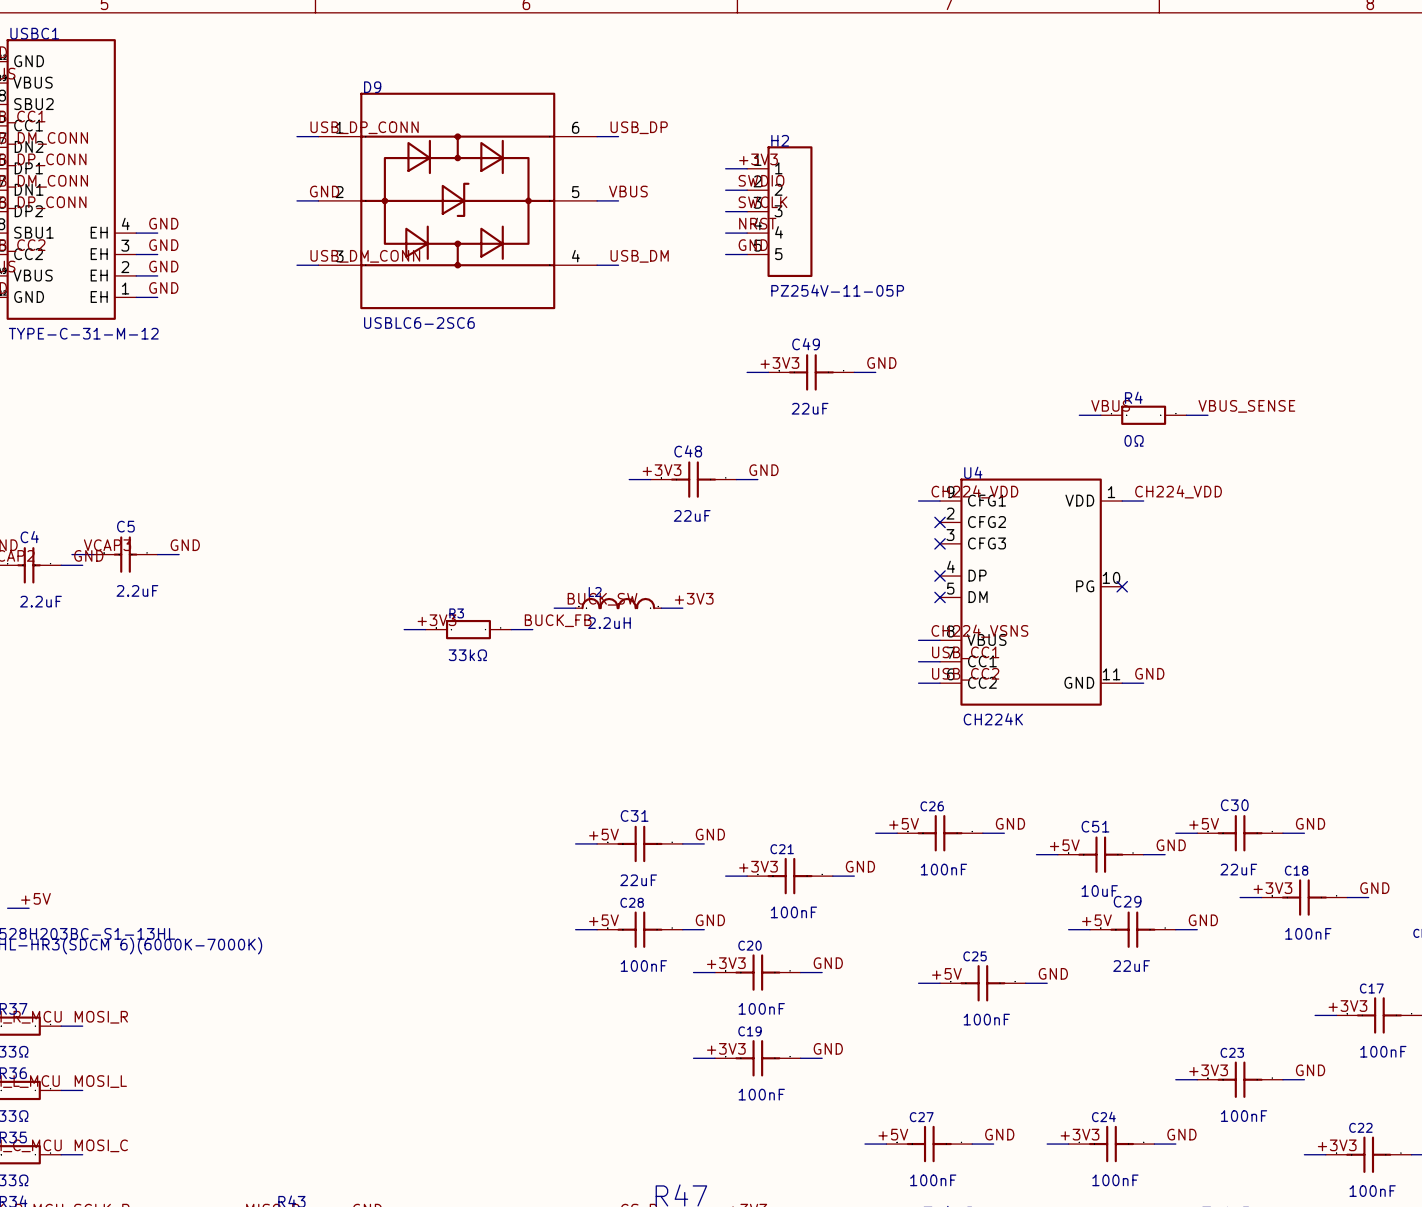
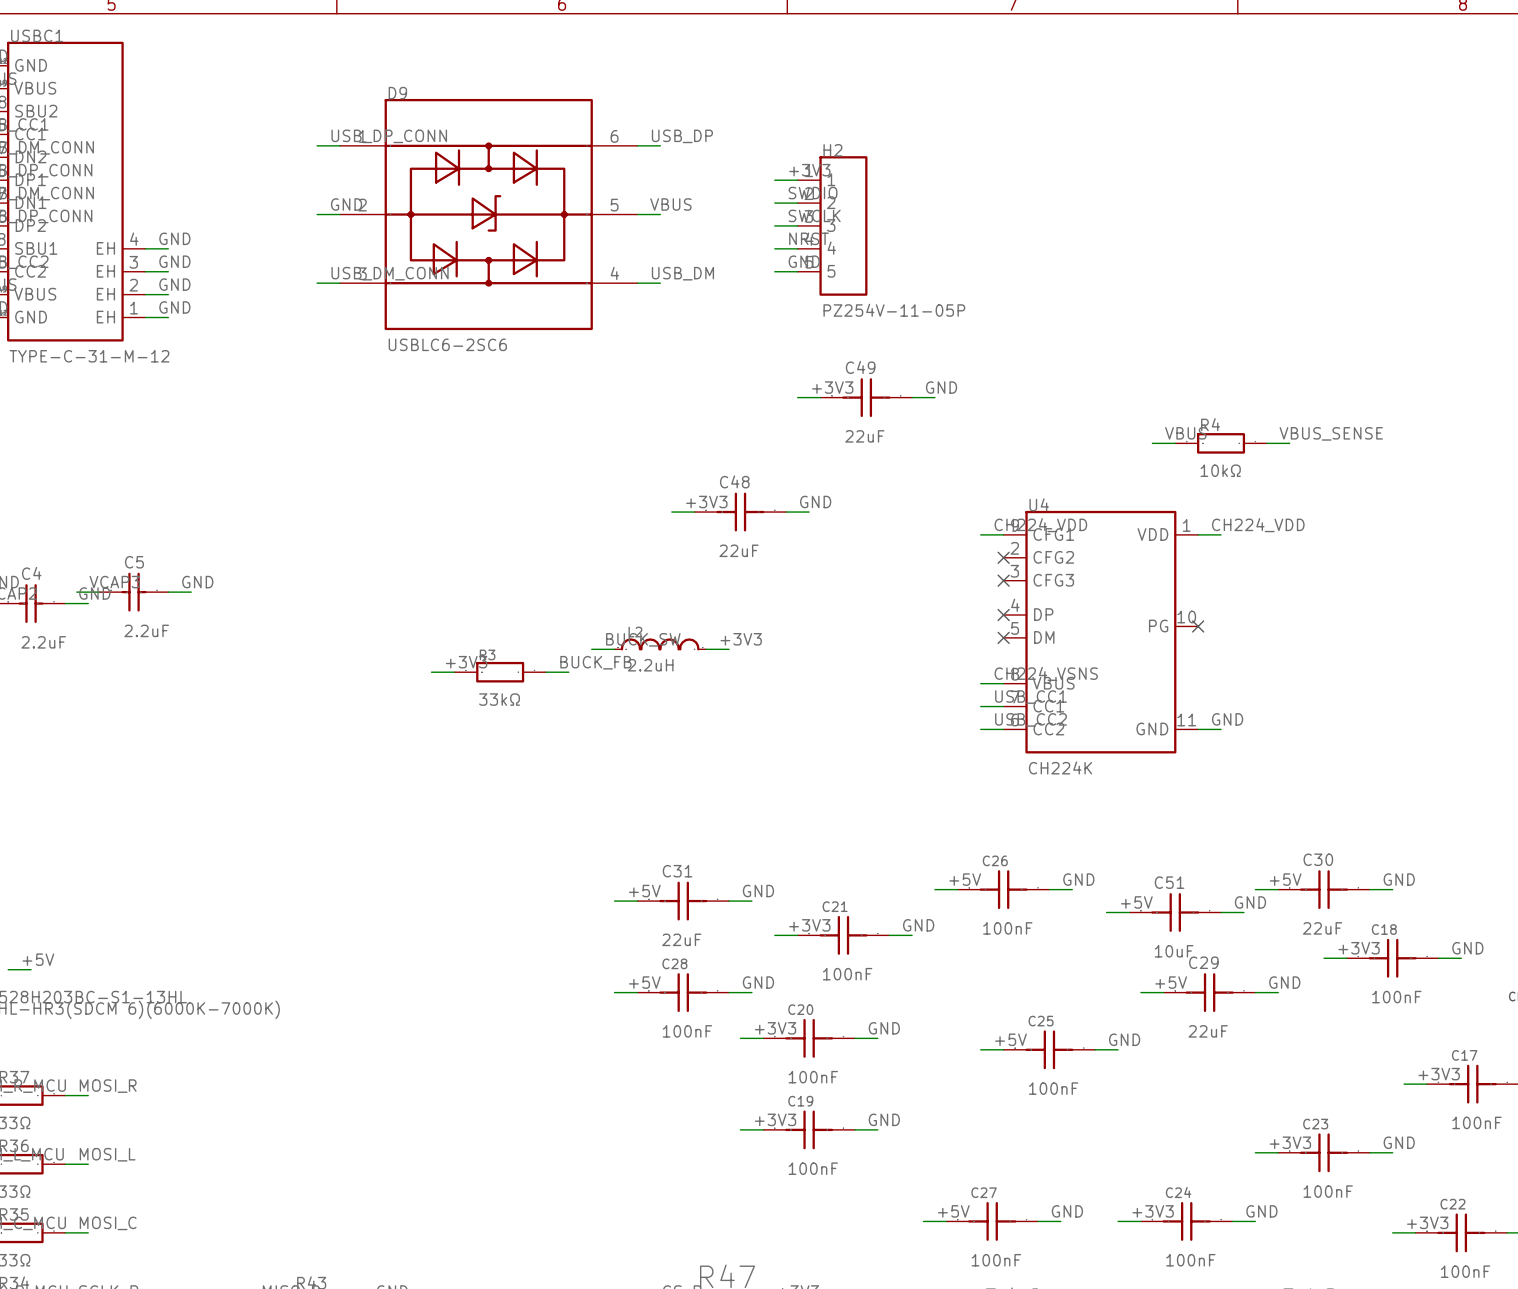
R4 value: 0Ω (1134, 440) -> 10kΩ (1220, 470)

